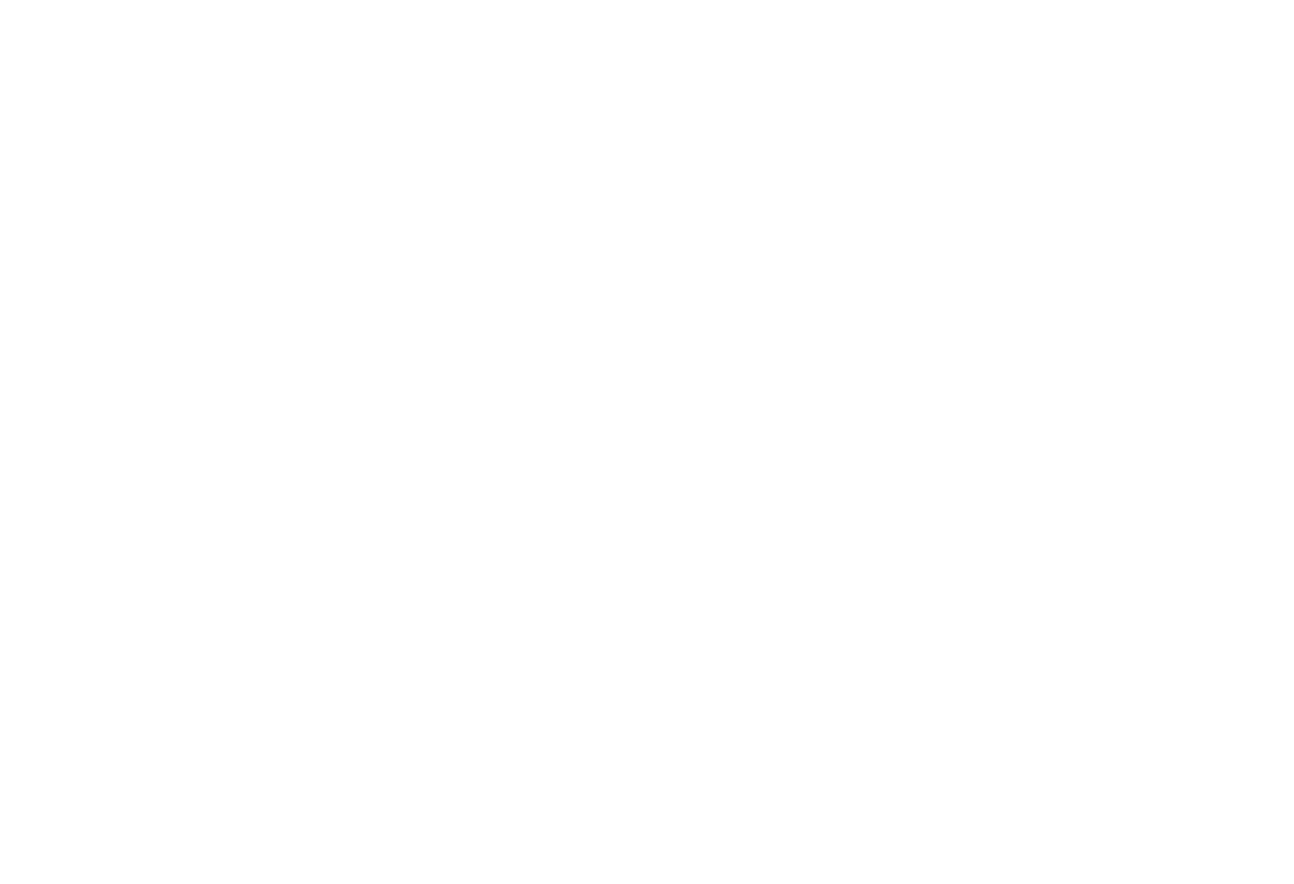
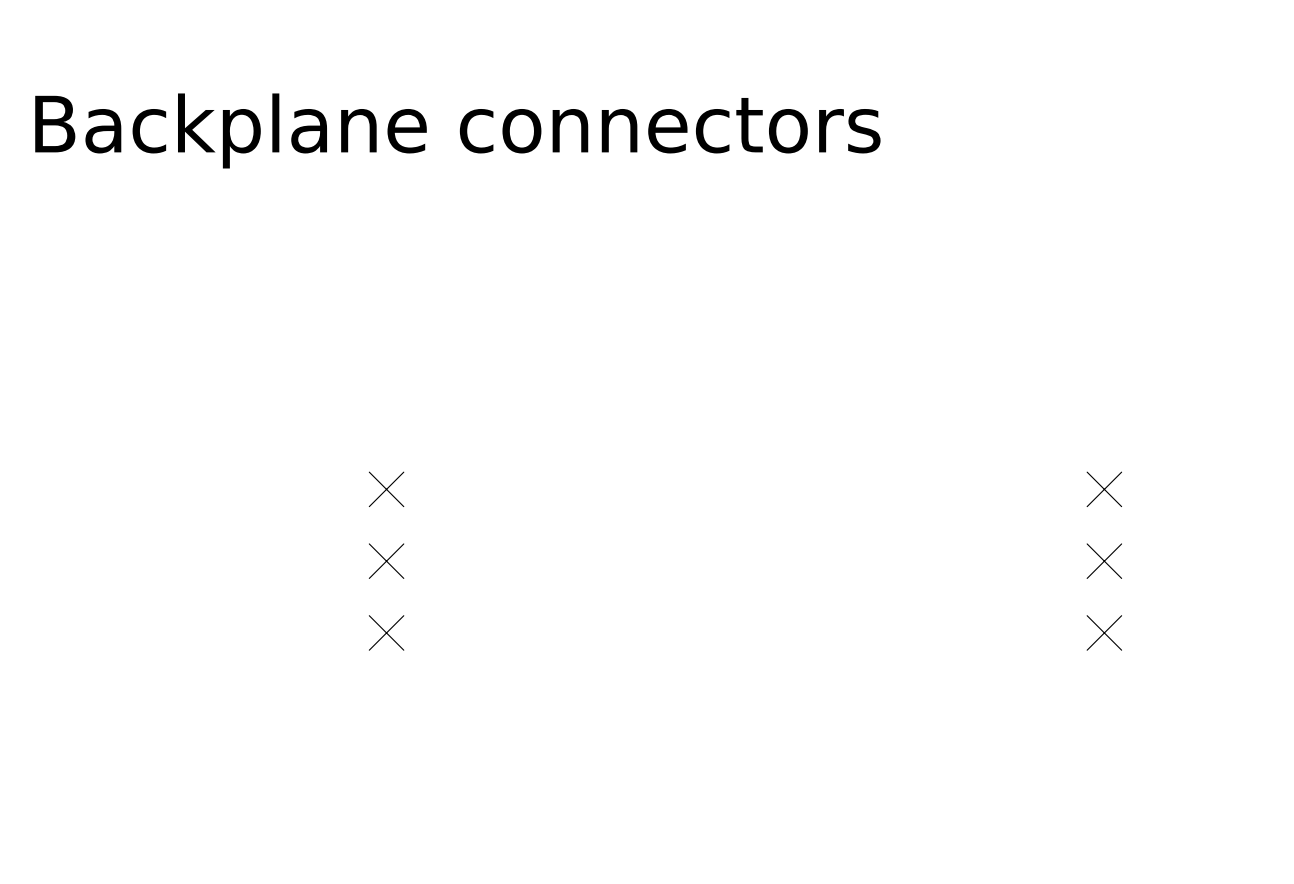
text: none -> Backplane connectors (457, 130)
no-connect mark: none -> (386, 489)
no-connect mark: none -> (1104, 489)
no-connect mark: none -> (386, 561)
no-connect mark: none -> (1104, 561)
no-connect mark: none -> (386, 632)
no-connect mark: none -> (1104, 632)

